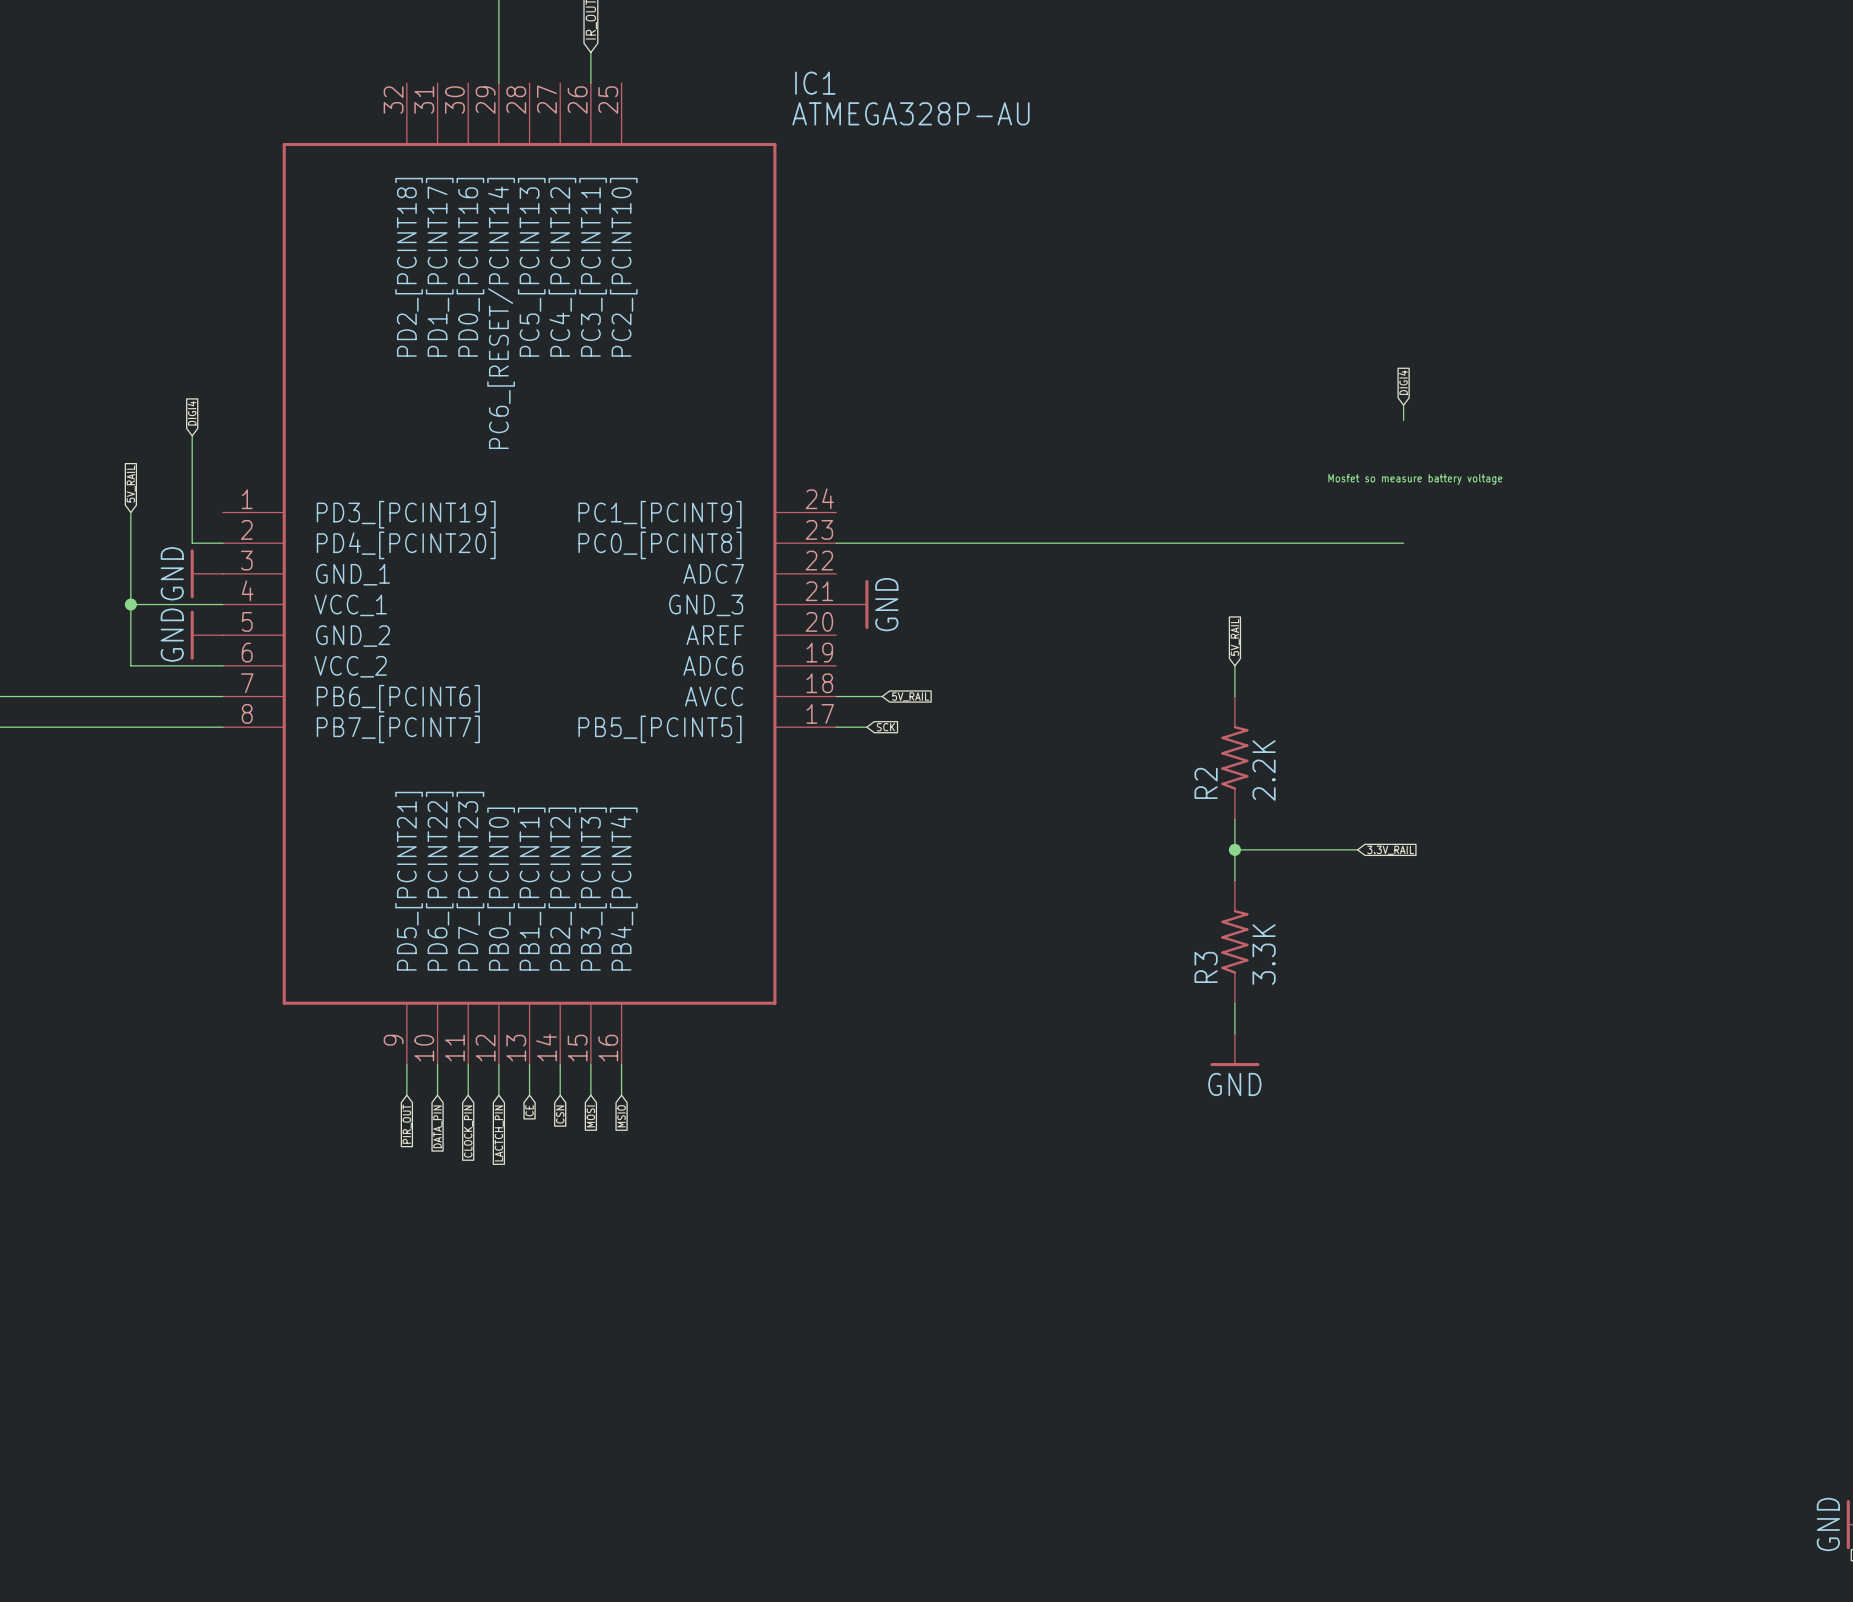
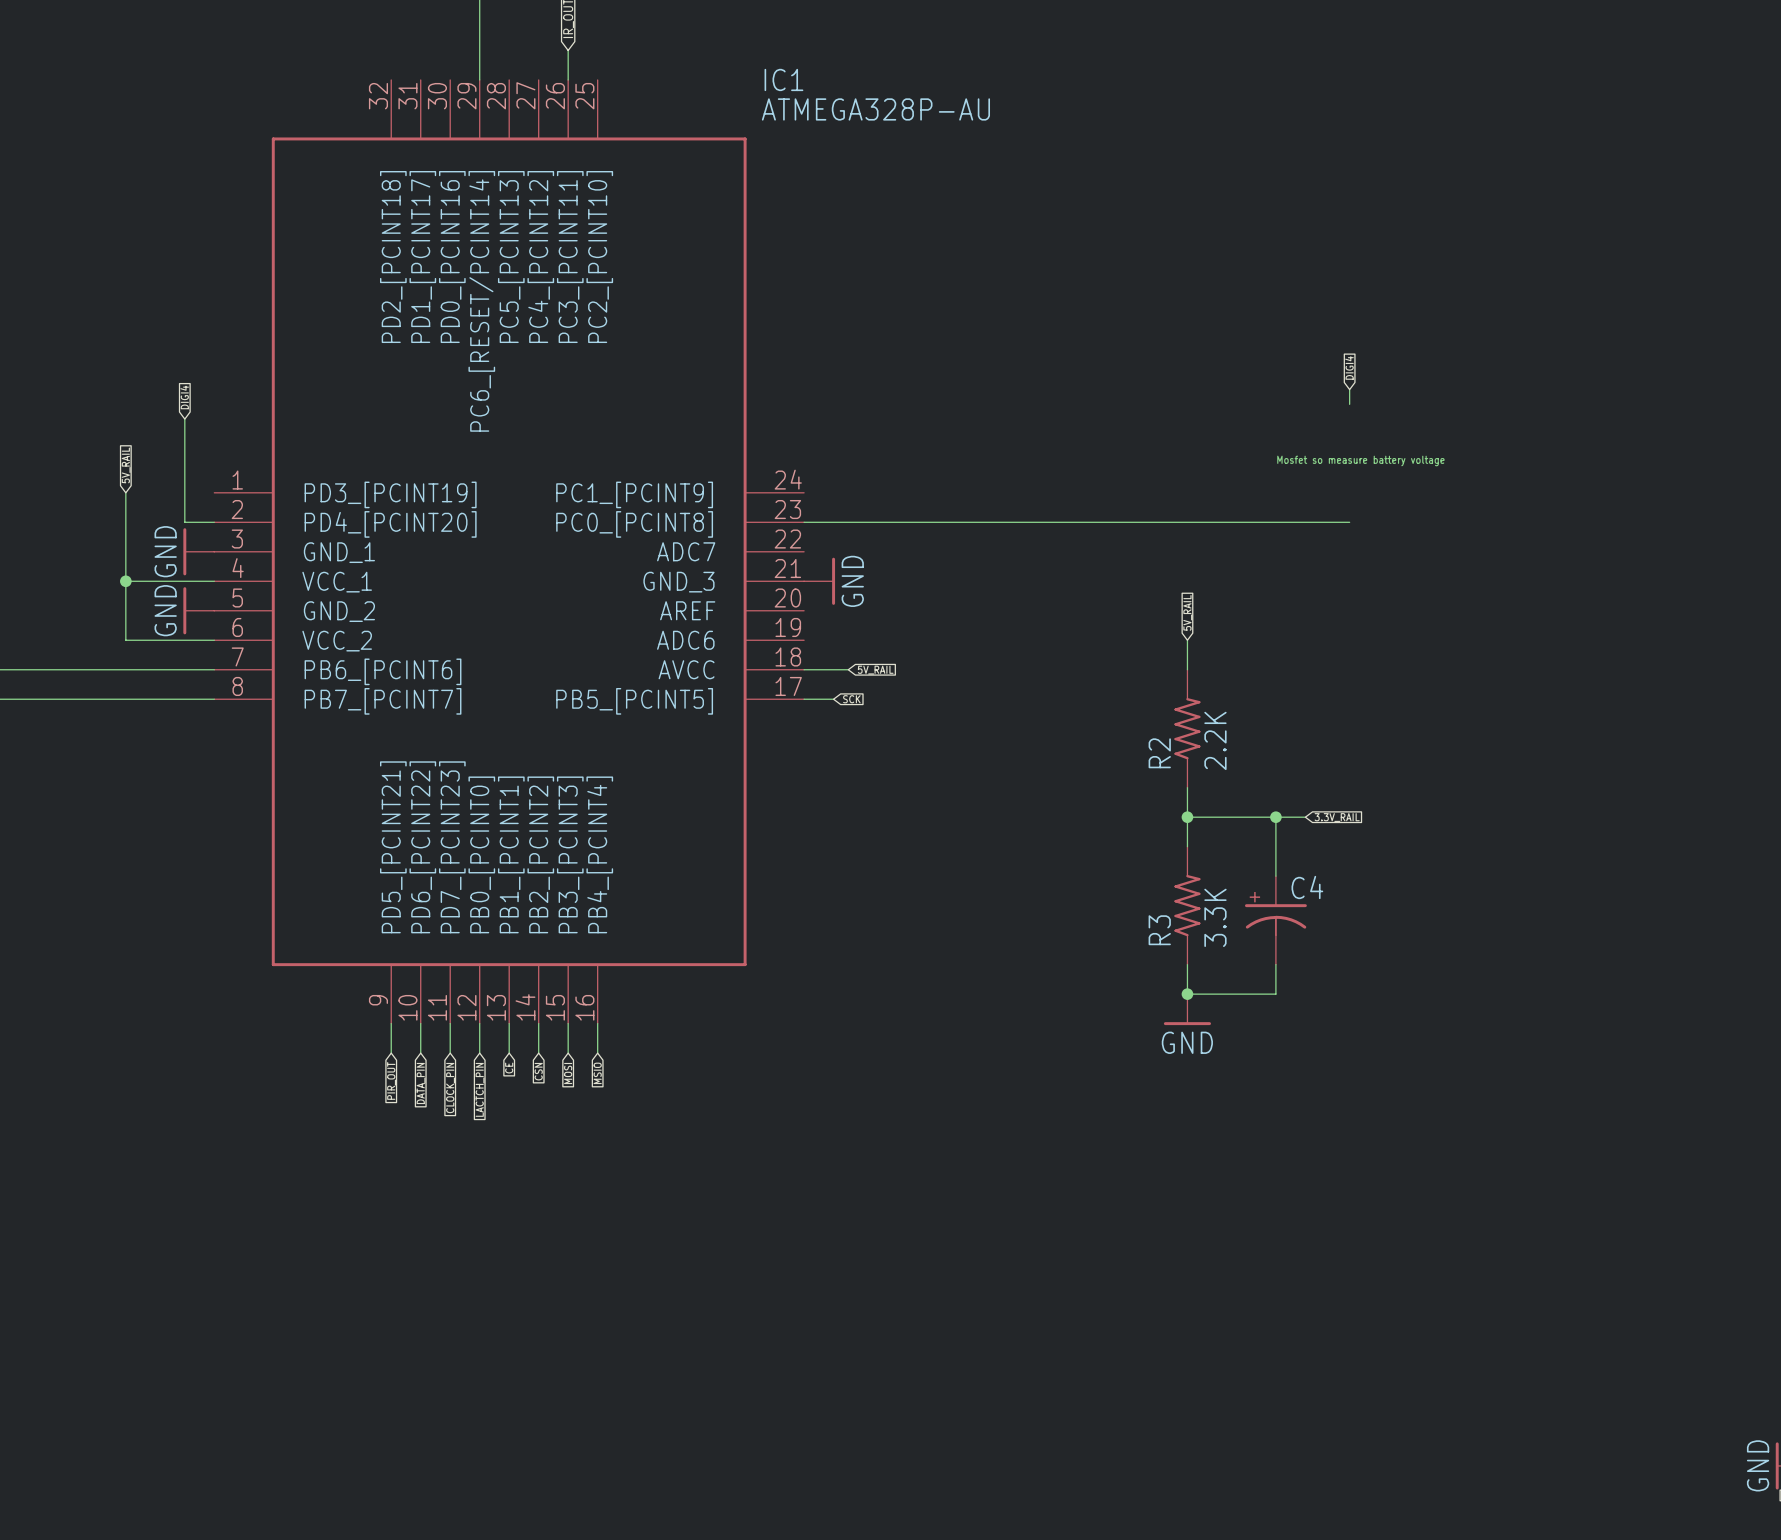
wire: none -> (1275, 817) (1275, 876)
junction: none -> (1275, 817)
C4: none -> (1275, 920)
wire: none -> (1275, 964) (1275, 994) (1187, 994)
junction: none -> (1187, 994)

